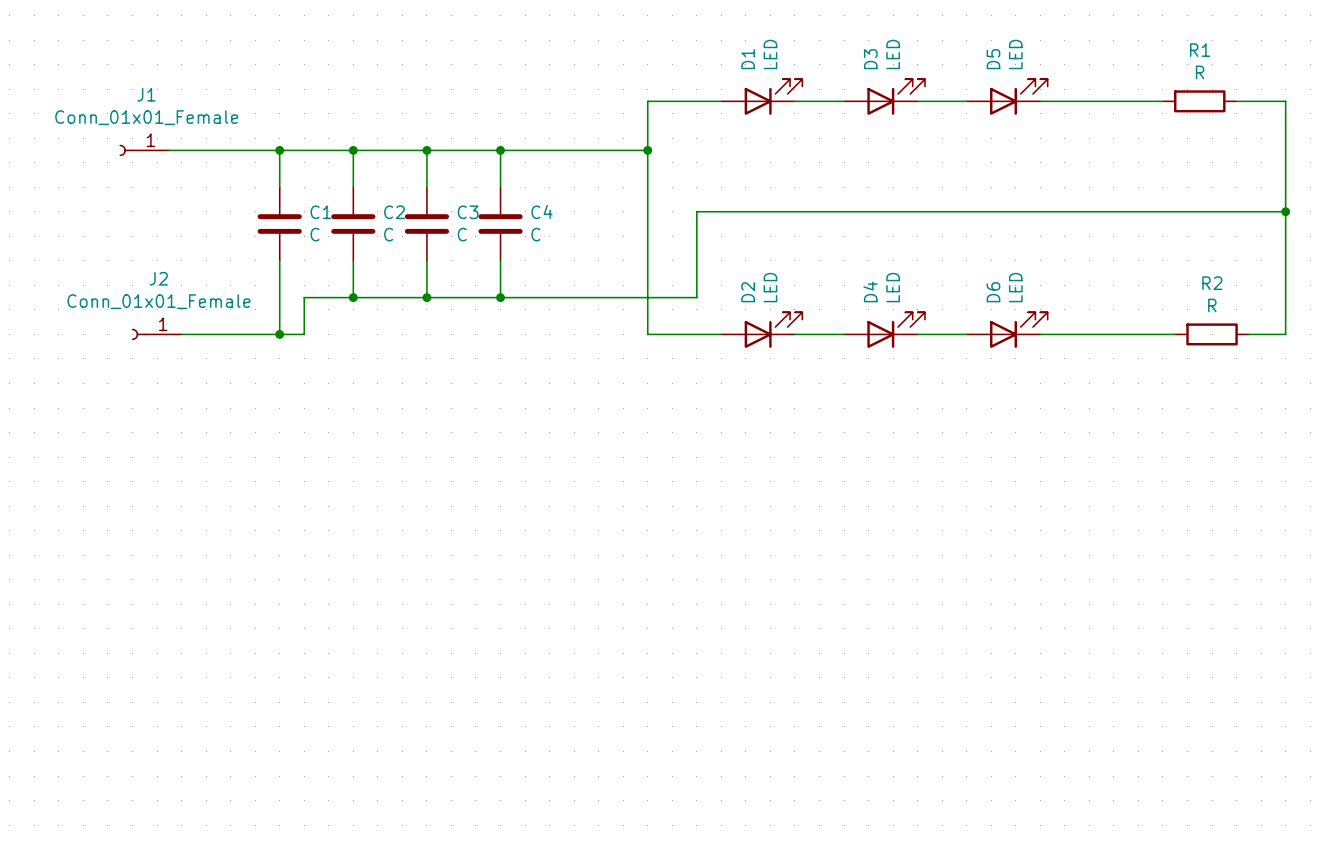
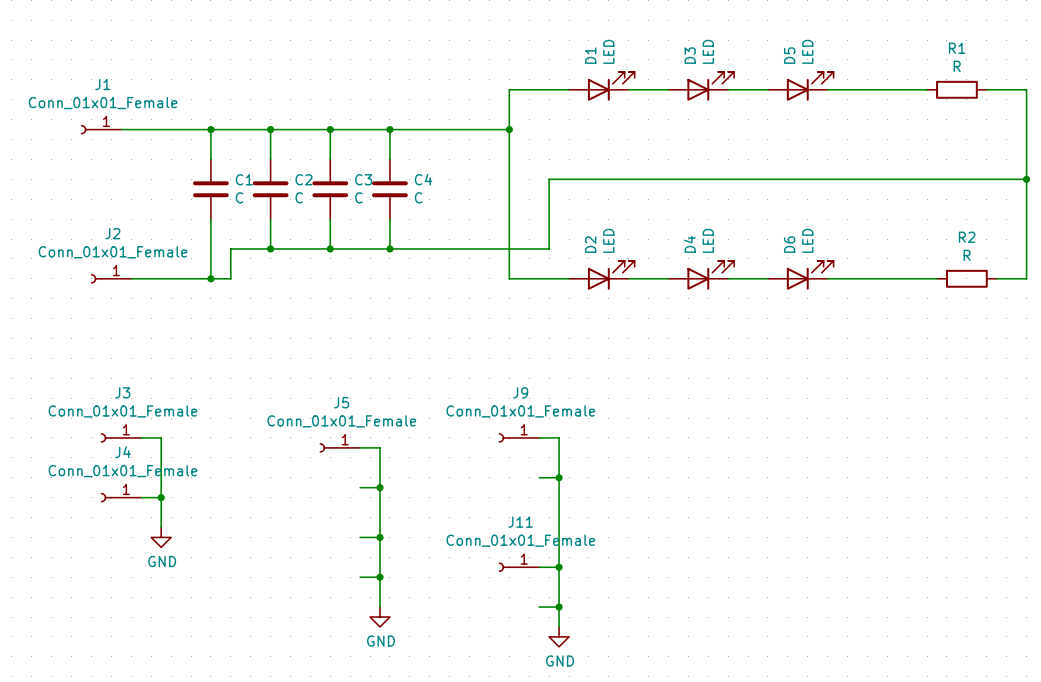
J3: none -> Conn_01x01_Female (121, 437)
wire: none -> (141, 437) (161, 437) (161, 527)
J9: none -> Conn_01x01_Female (518, 437)
wire: none -> (539, 437) (559, 437) (559, 626)
J5: none -> Conn_01x01_Female (339, 447)
wire: none -> (360, 447) (380, 447) (380, 607)
wire: none -> (539, 477) (559, 477)
junction: none -> (559, 477)
wire: none -> (360, 487) (380, 487)
junction: none -> (380, 487)
J4: none -> Conn_01x01_Female (121, 497)
wire: none -> (141, 497) (161, 497)
junction: none -> (161, 497)
power symbol: none -> GND (161, 537)
wire: none -> (360, 537) (380, 537)
junction: none -> (380, 537)
J11: none -> Conn_01x01_Female (518, 567)
wire: none -> (539, 567) (559, 567)
junction: none -> (559, 567)
wire: none -> (360, 577) (380, 577)
junction: none -> (380, 577)
wire: none -> (539, 607) (559, 607)
junction: none -> (559, 607)
power symbol: none -> GND (380, 617)
power symbol: none -> GND (559, 636)

